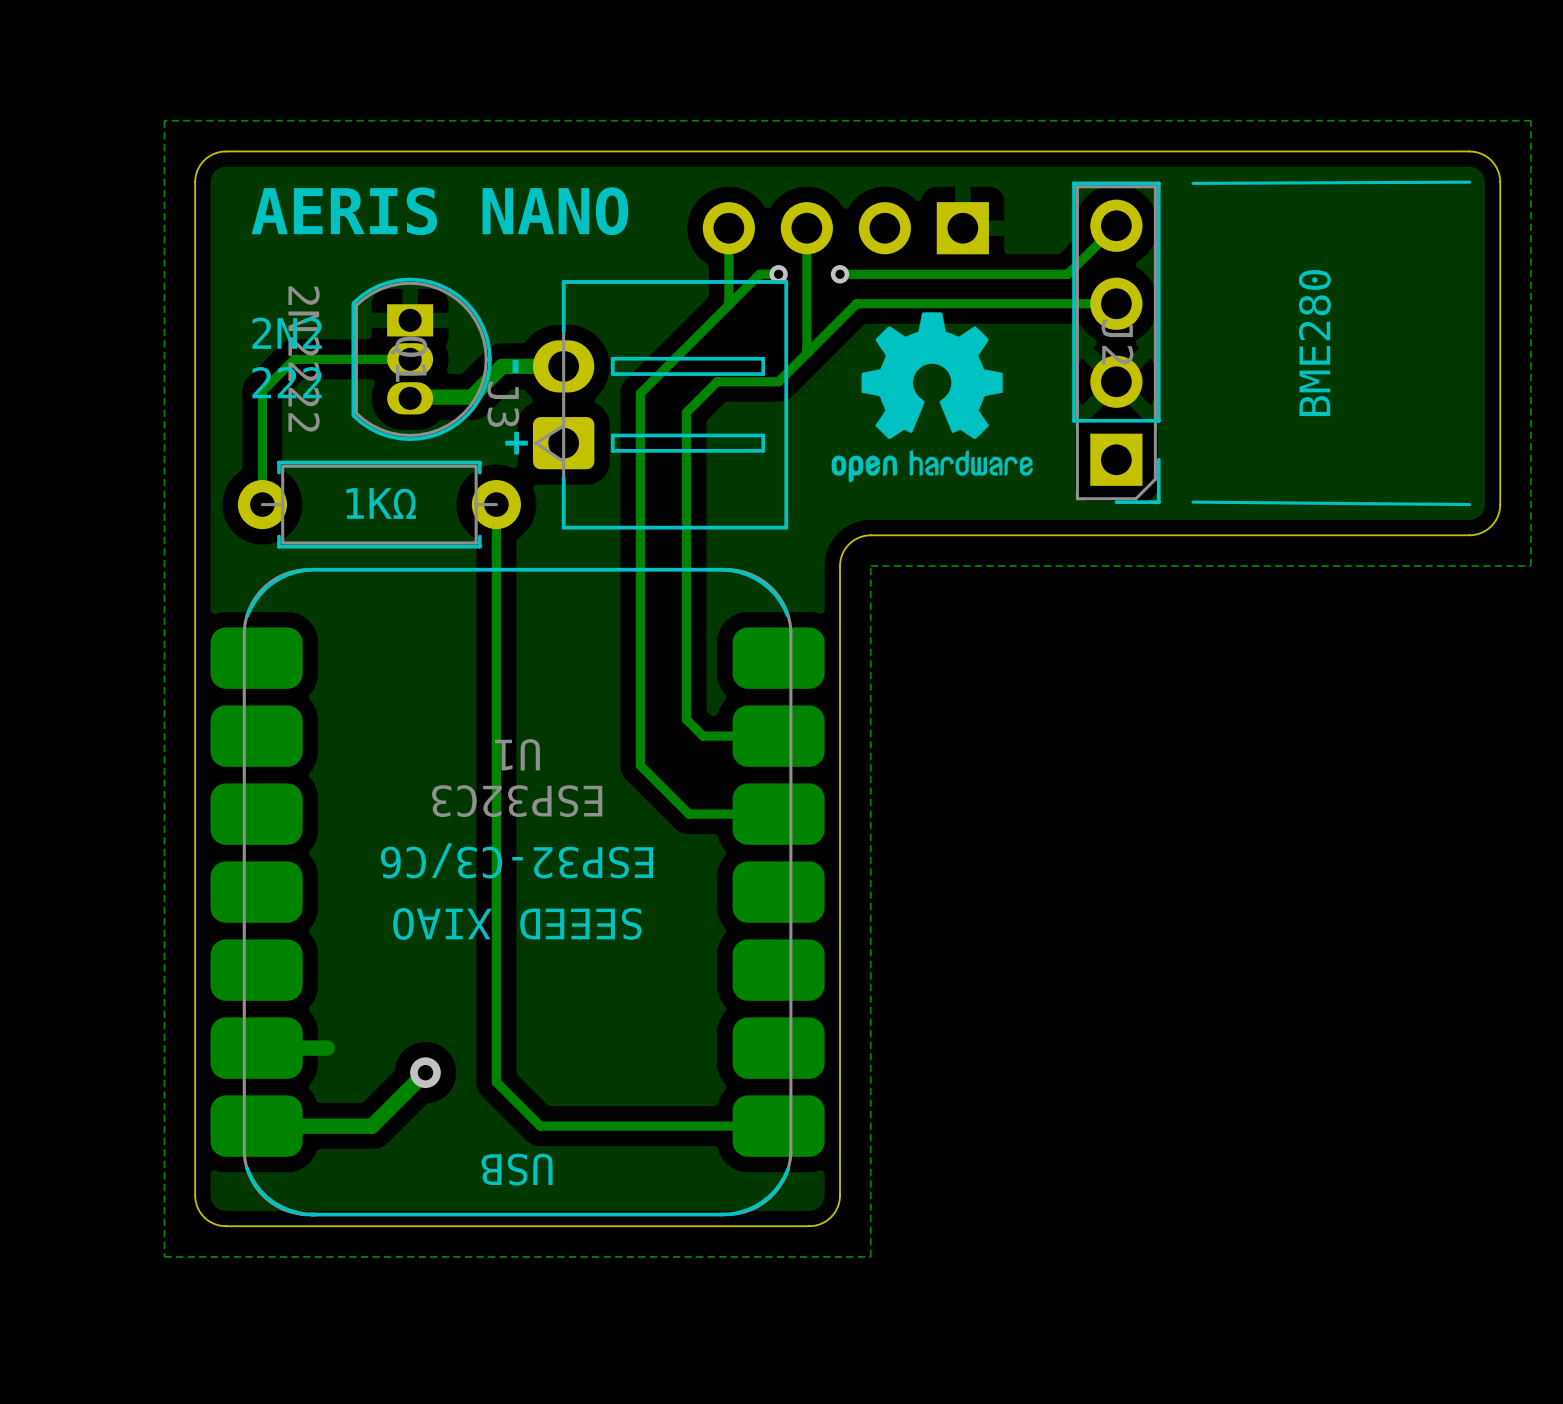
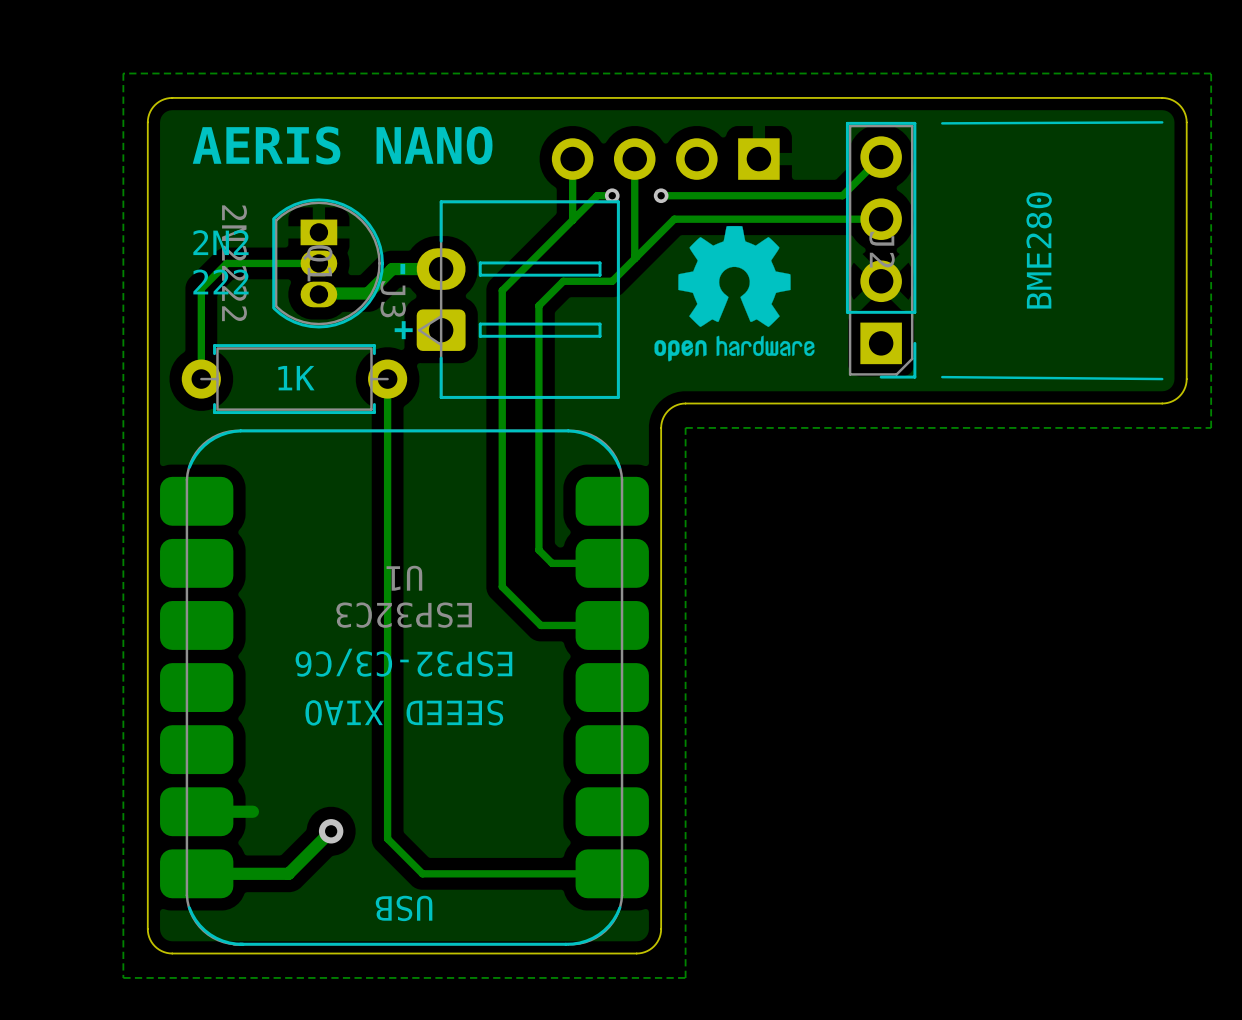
text: 1KΩ (381, 503) -> 1K (296, 378)

